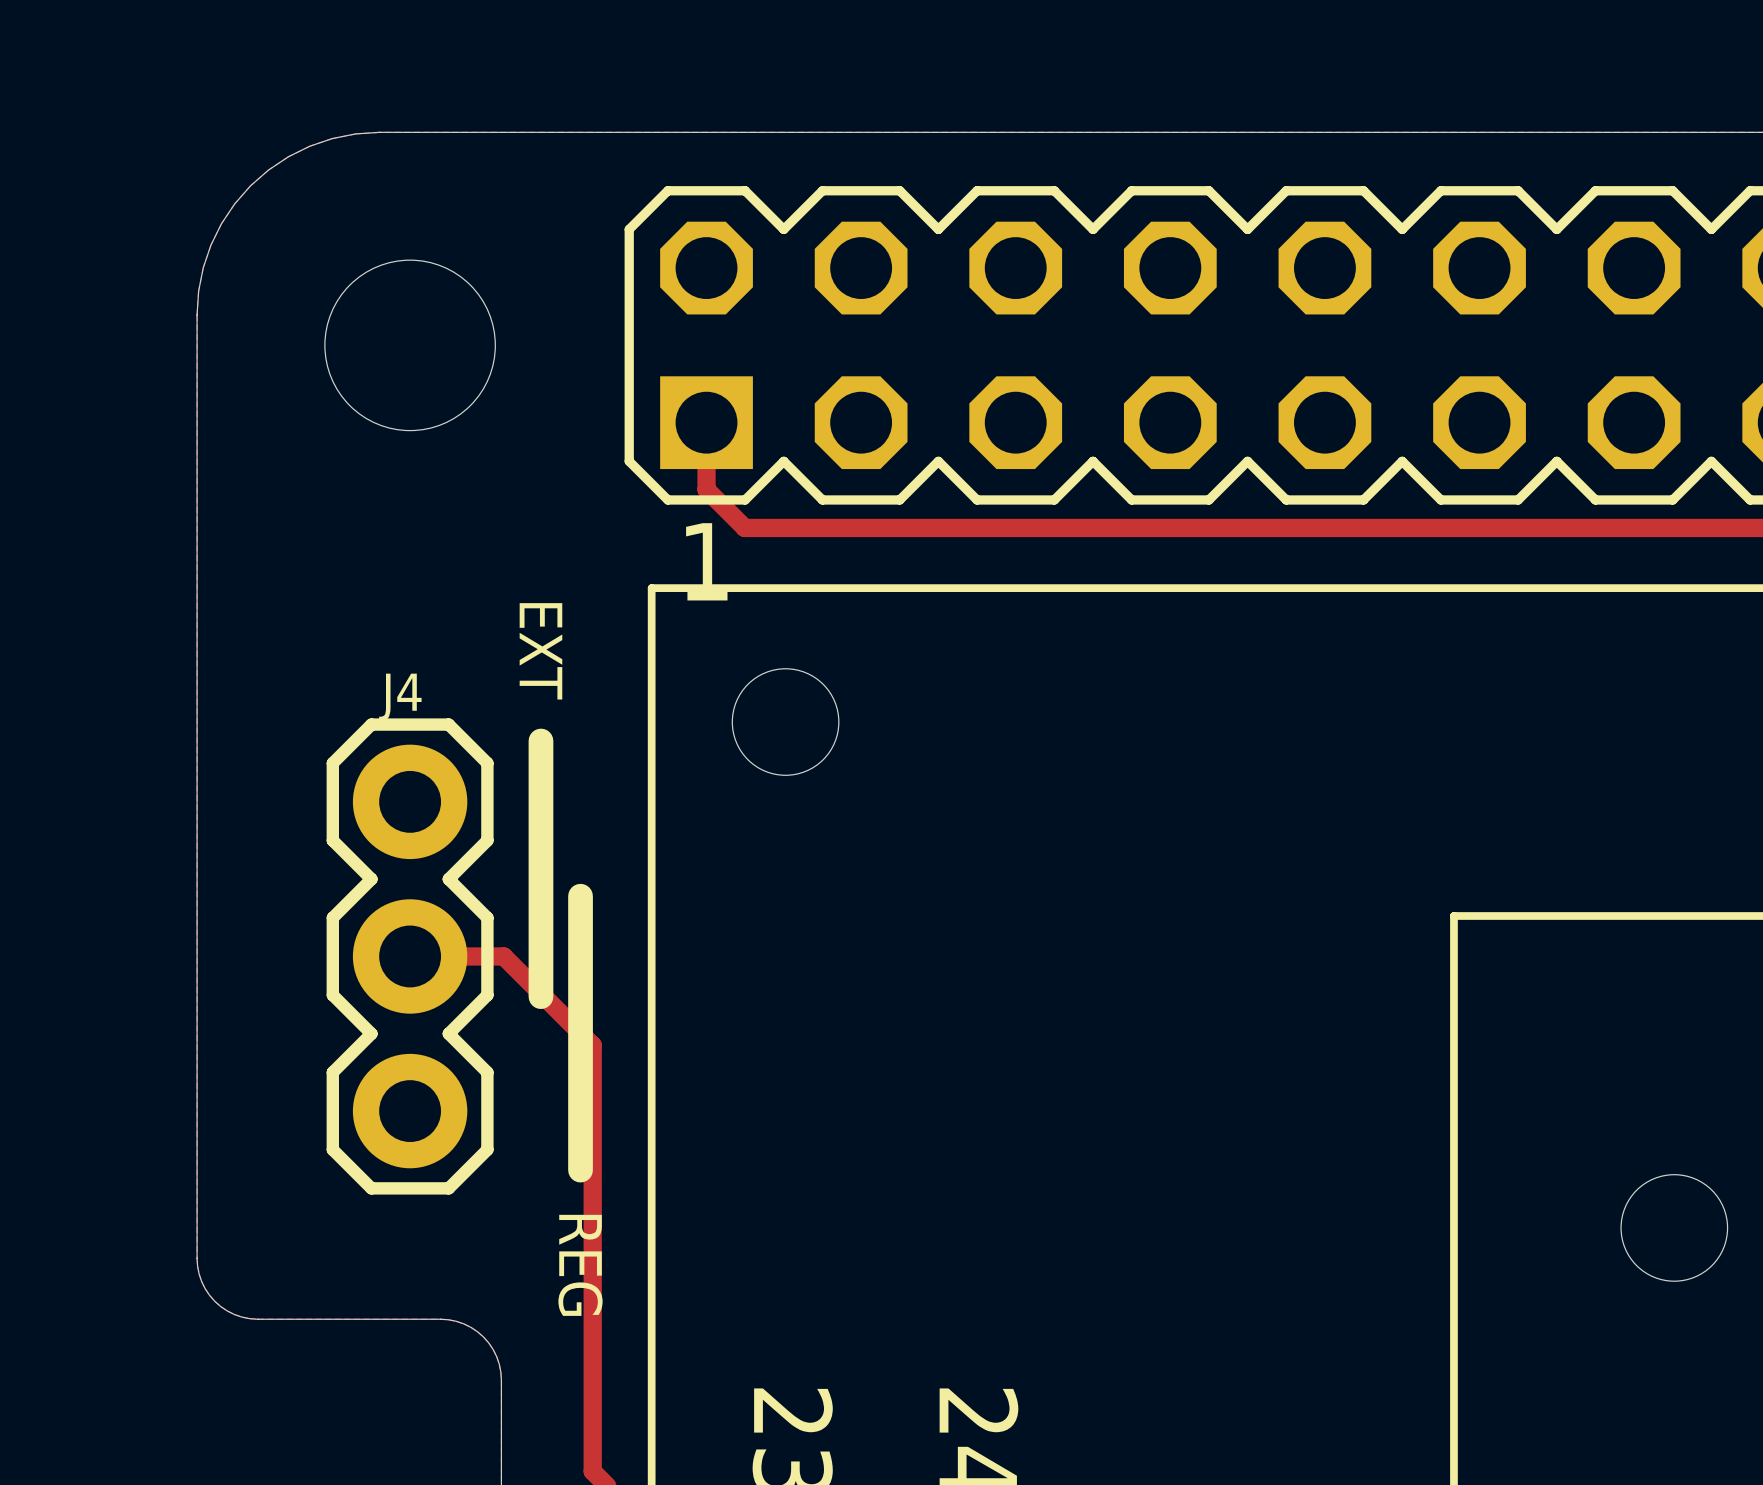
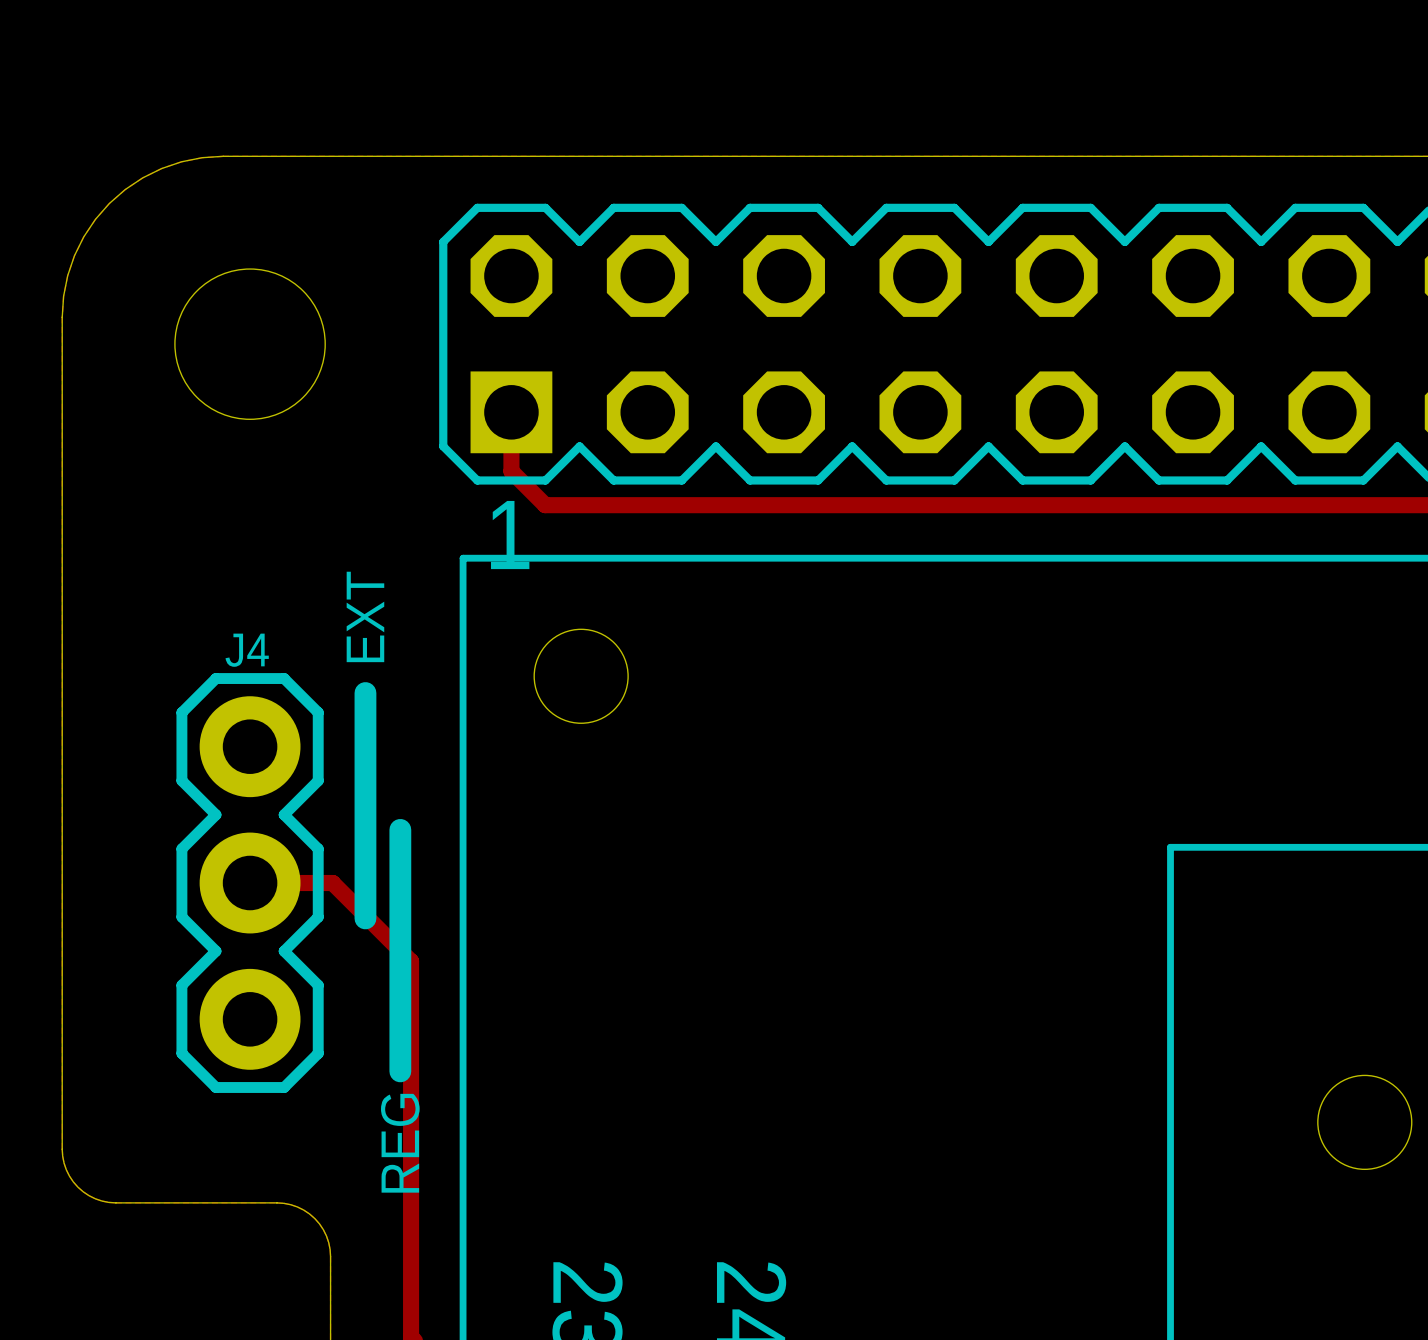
text rotation: 0° (540, 651) -> 180° (365, 616)
text rotation: 0° (580, 1265) -> 180° (400, 1143)

